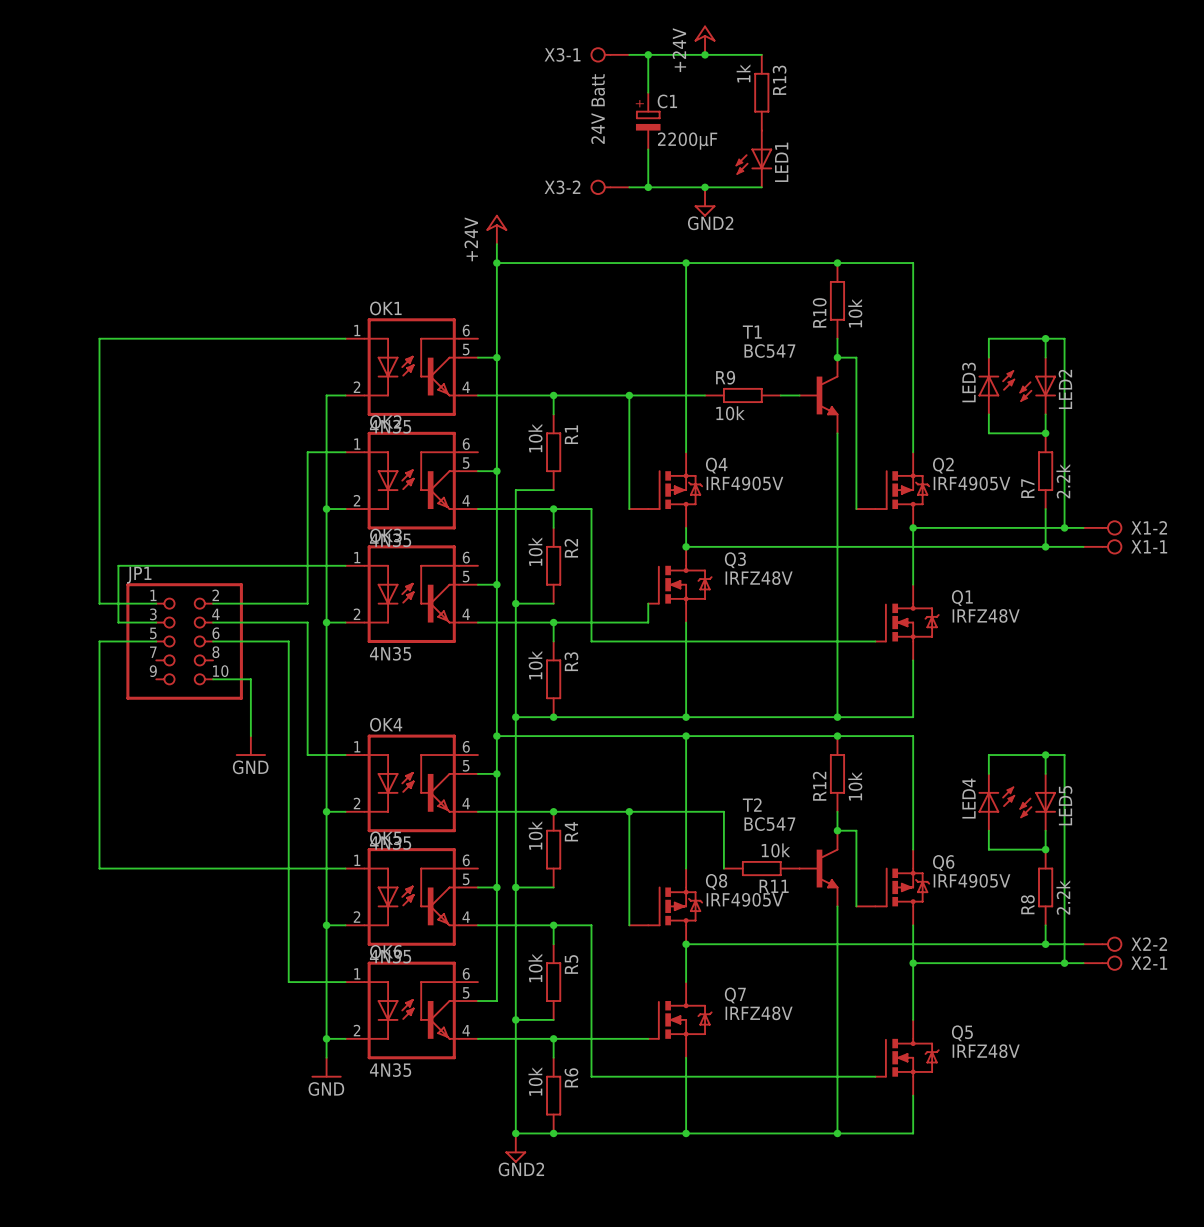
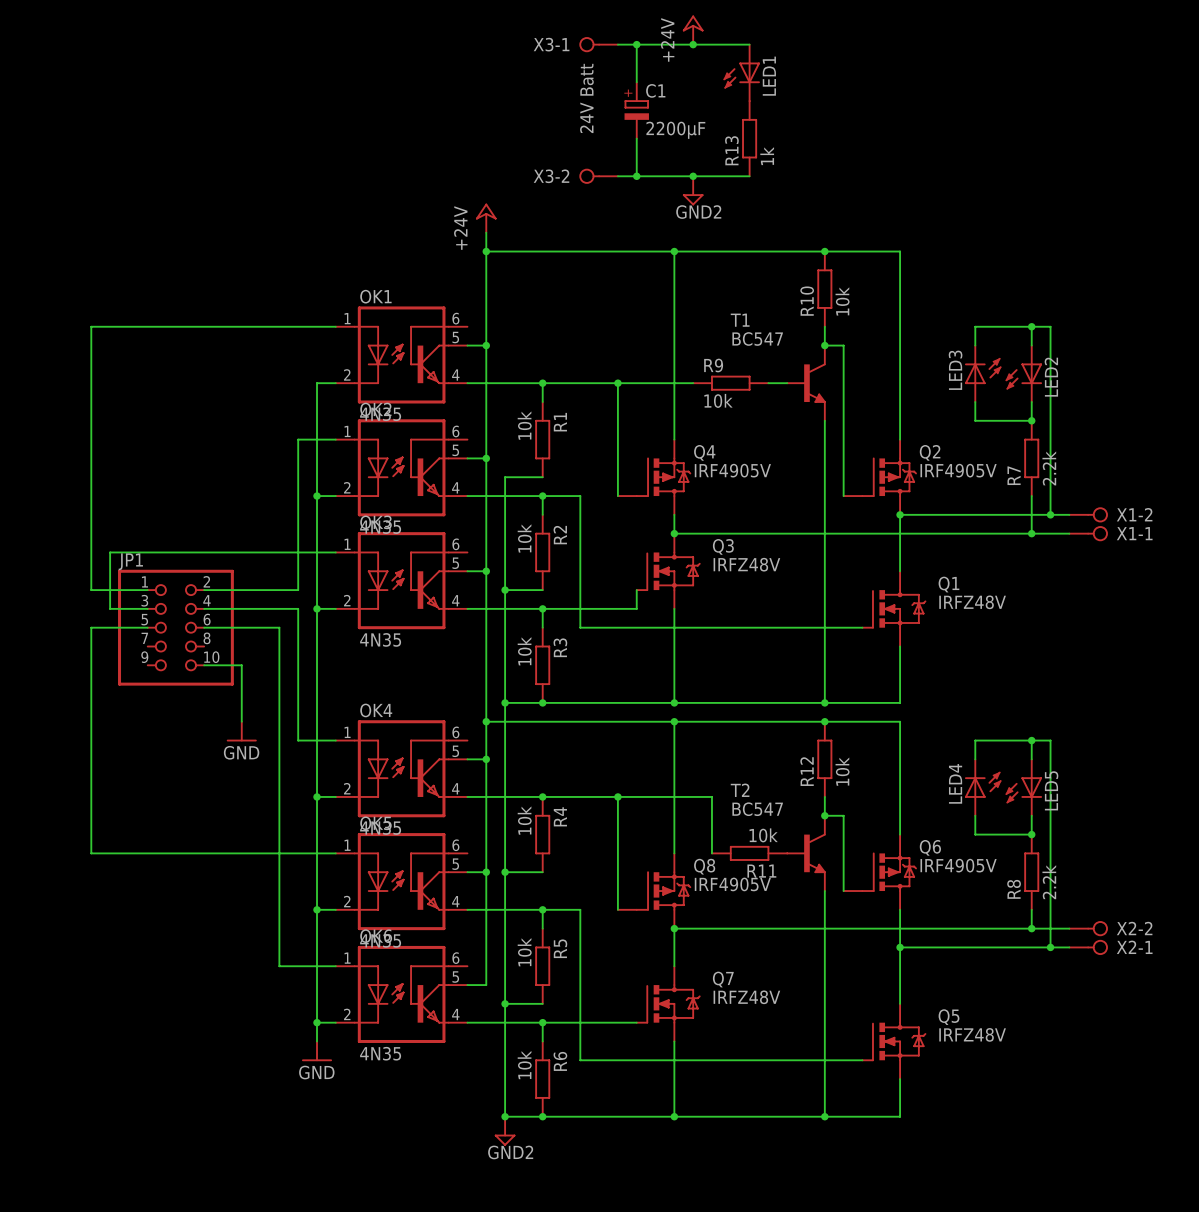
R13 value position: 1k (743, 73) -> 1k (767, 156)
R13 name position: R13 (779, 80) -> R13 (731, 150)
R13 position: (761, 92) -> (749, 138)
LED1 position: (753, 158) -> (741, 72)

